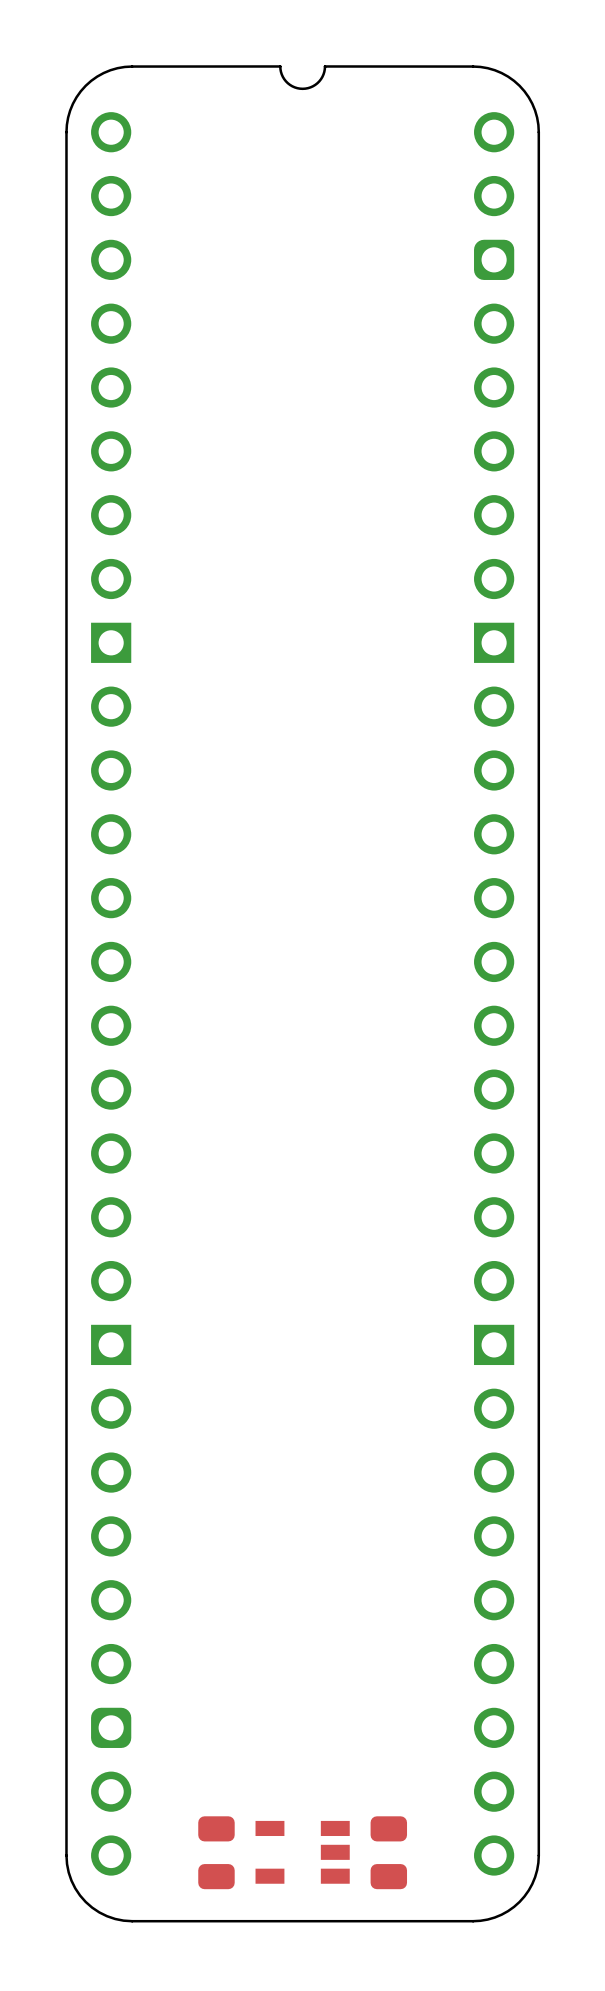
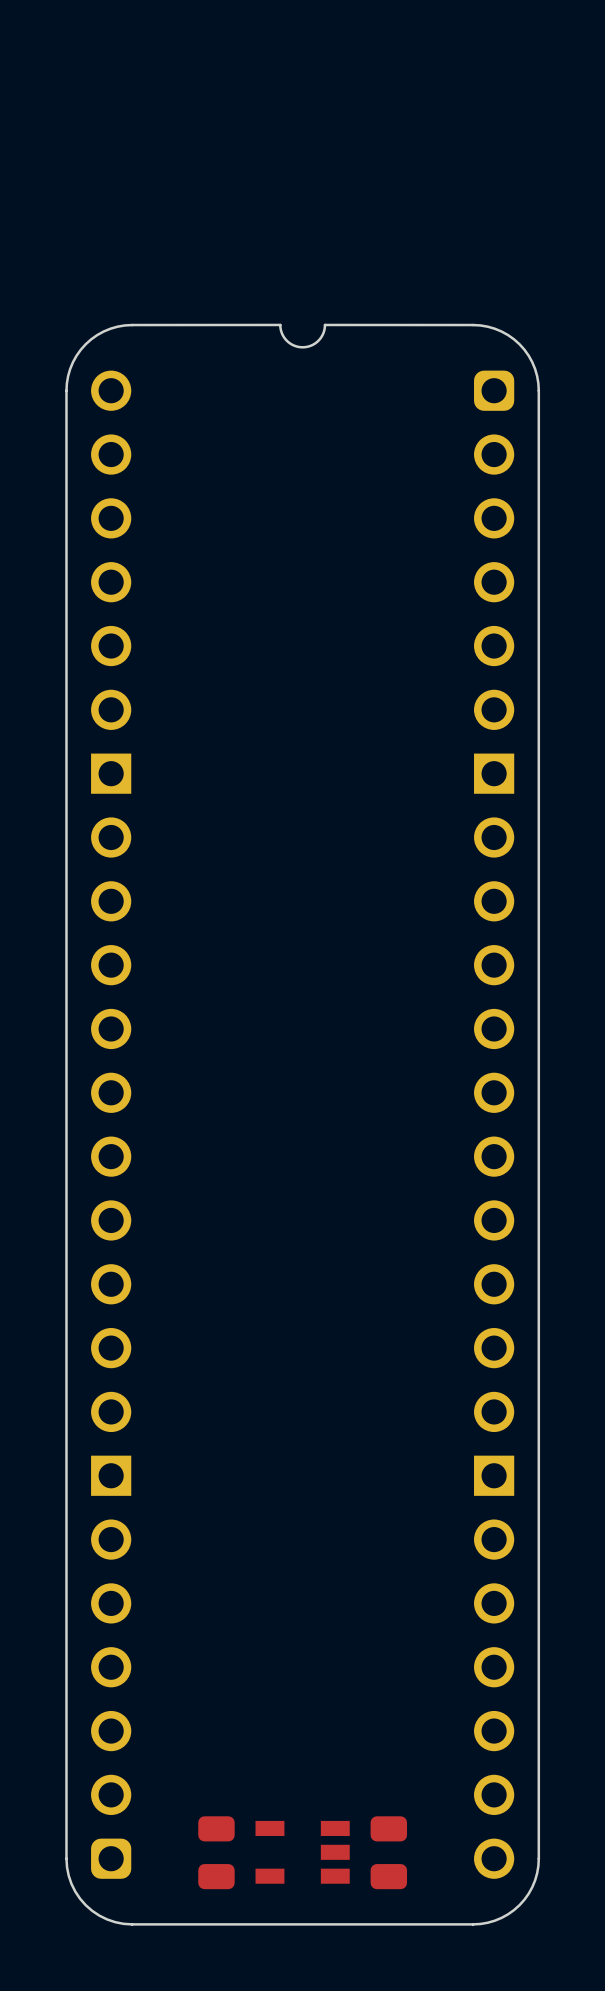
part: (302, 993) -> none
part: none -> (302, 1124)

